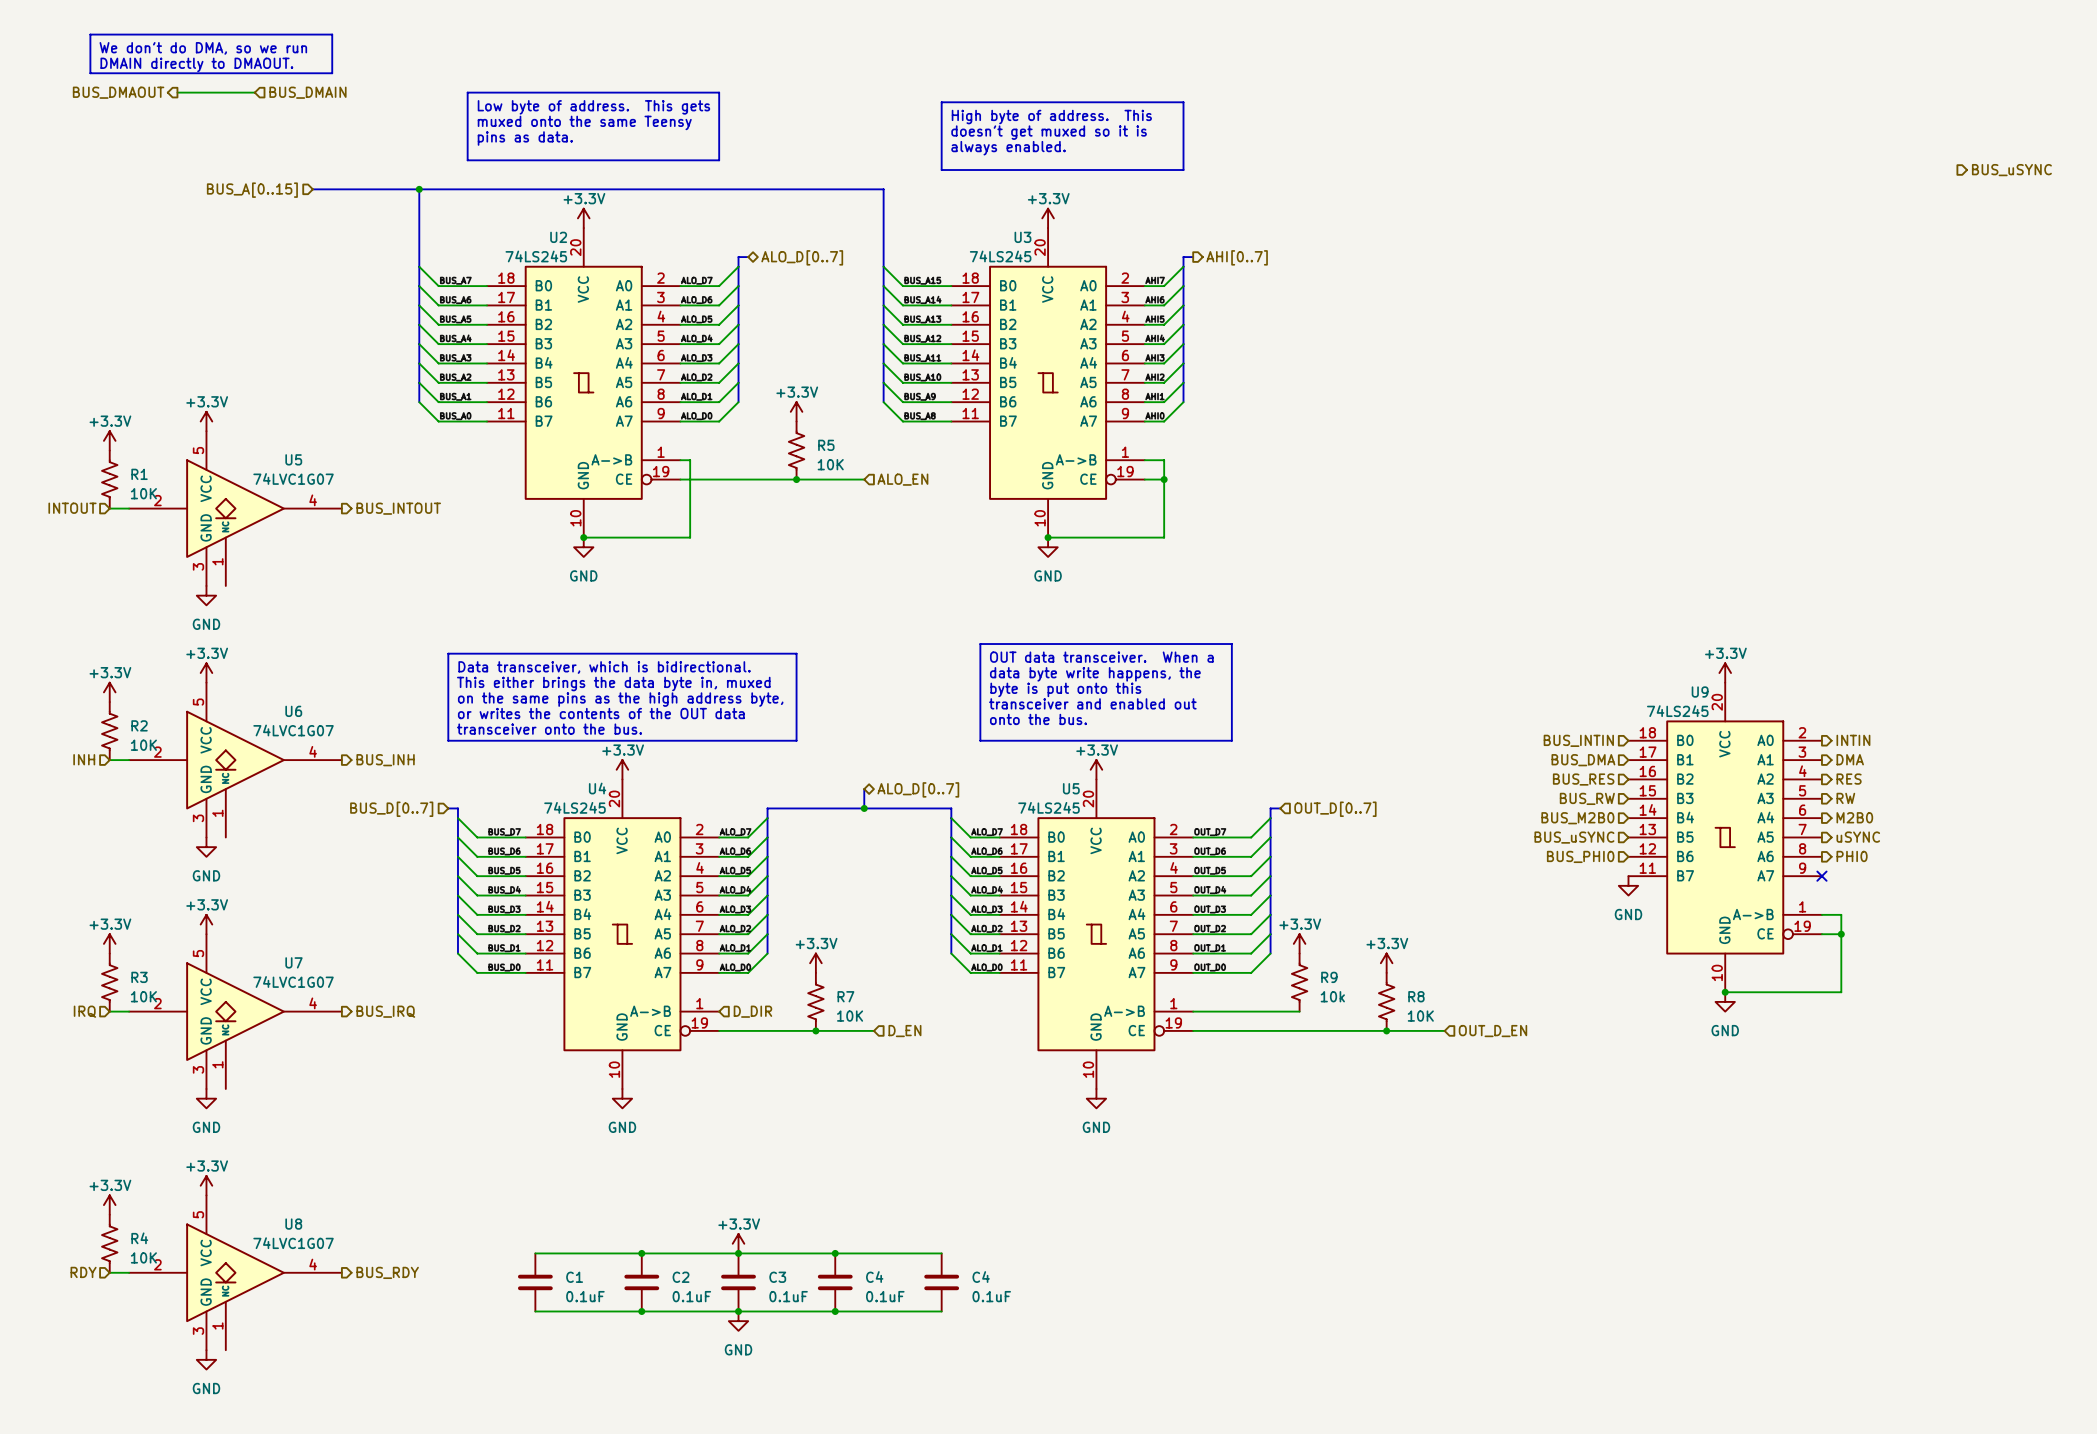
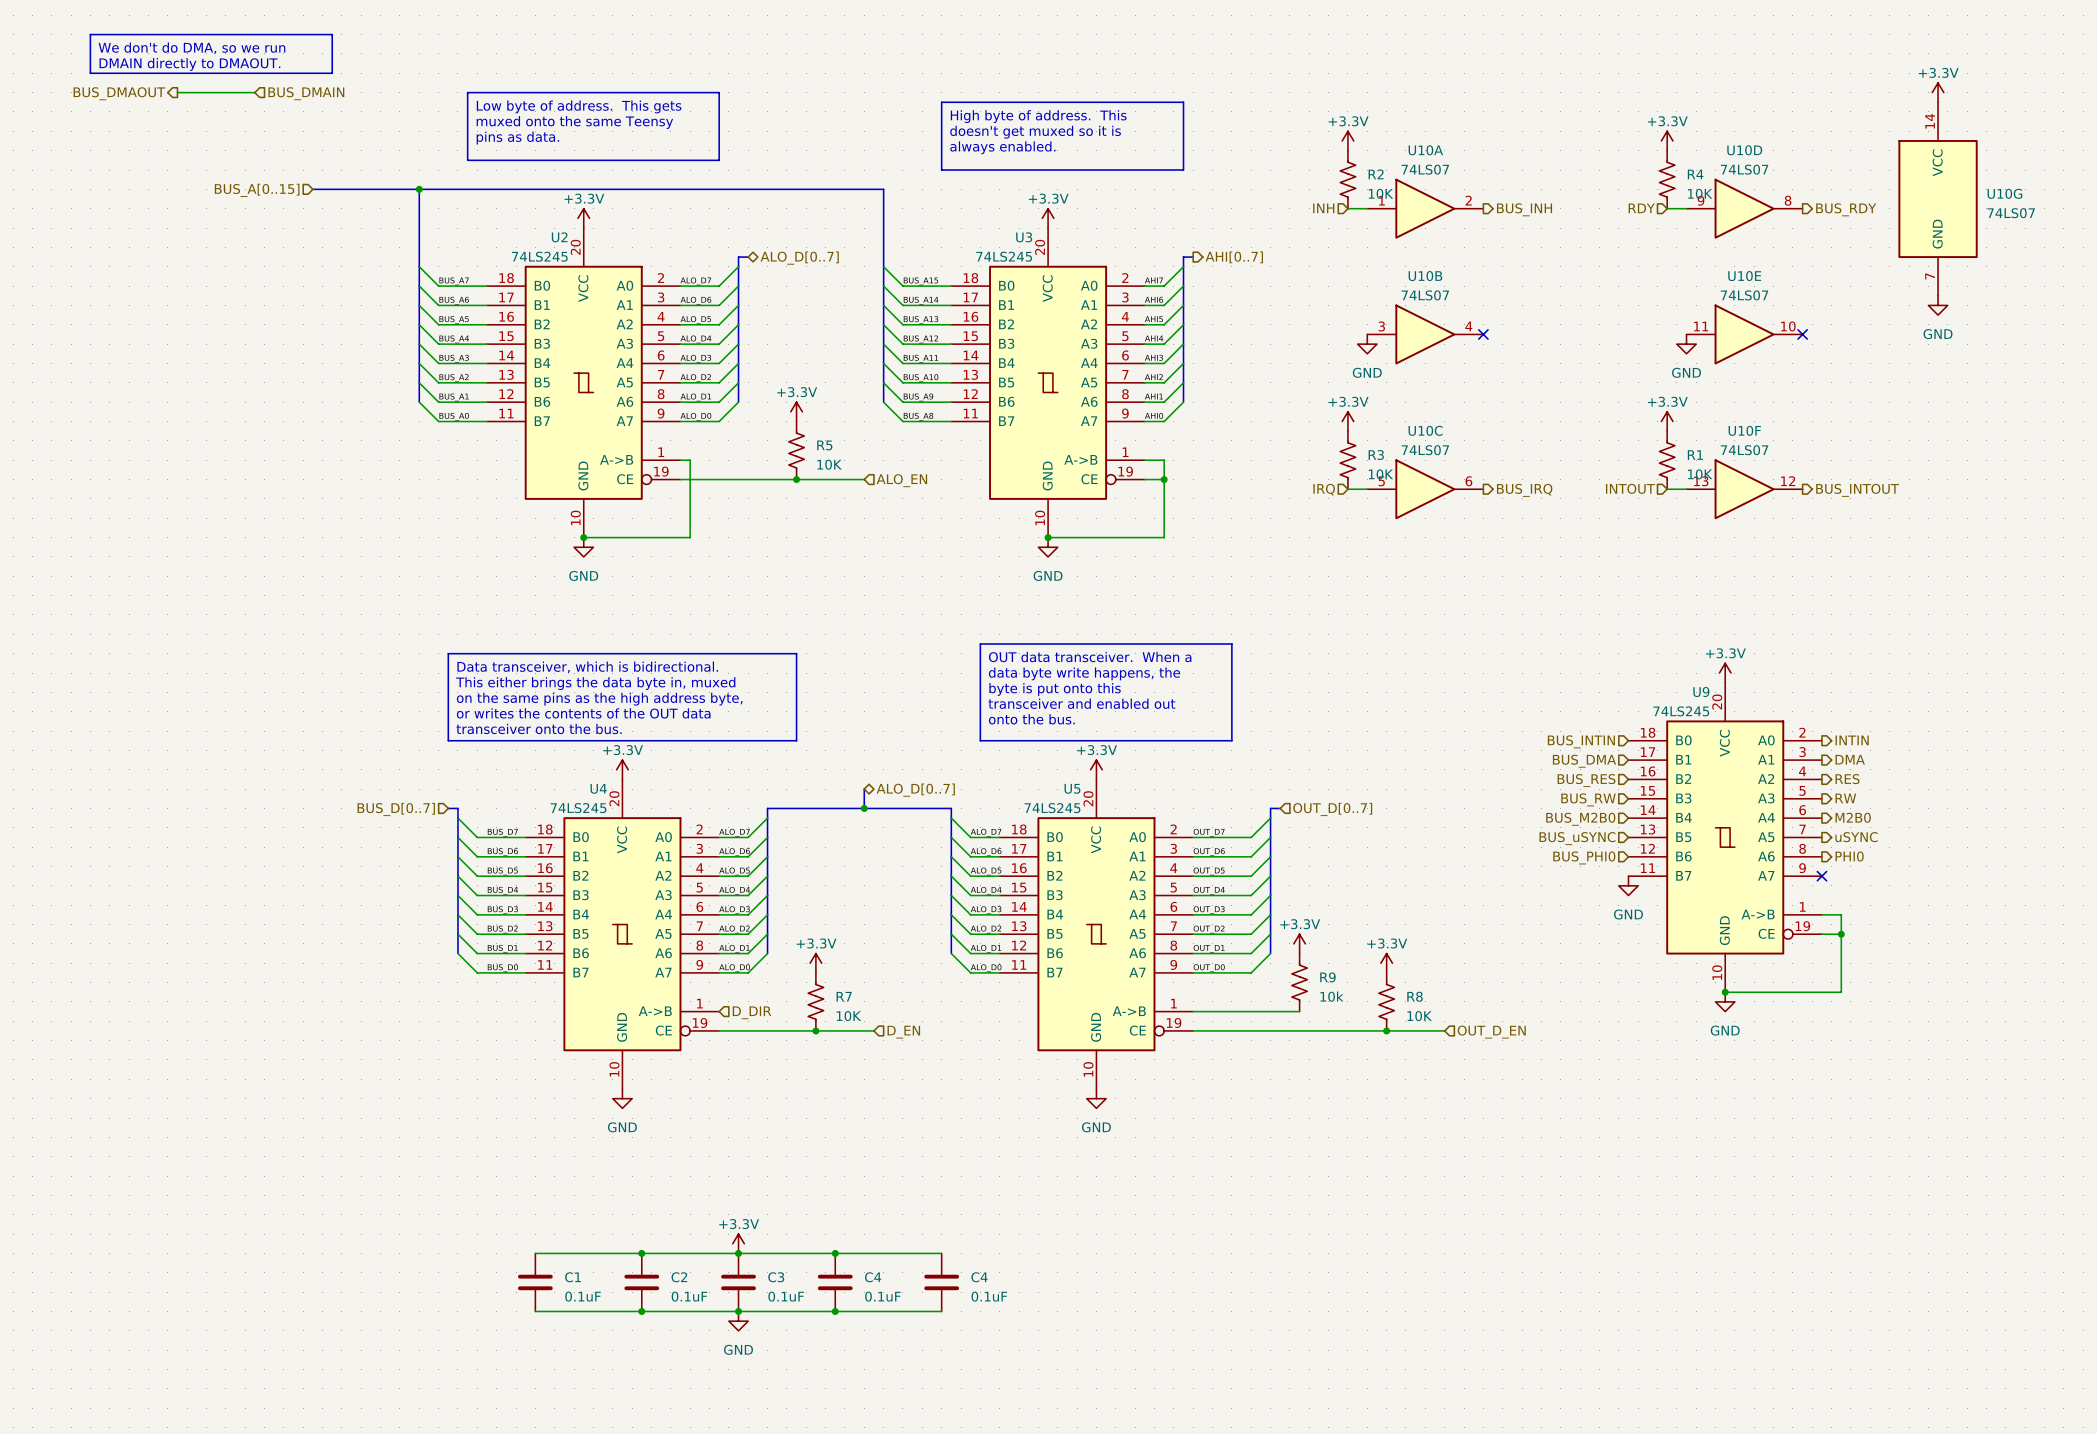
power symbol: none -> +3.3V (1938, 92)
power symbol: none -> +3.3V (1347, 140)
power symbol: none -> +3.3V (1667, 140)
hierarchical label: BUS_uSYNC (2011, 170) -> none
U10G: none -> 74LS07 (1938, 199)
hierarchical label: none -> INH (1323, 208)
wire: none -> (1347, 208) (1367, 208)
U10A: none -> 74LS07 (1425, 208)
hierarchical label: none -> BUS_INH (1524, 209)
hierarchical label: none -> RDY (1641, 208)
wire: none -> (1667, 208) (1686, 208)
U10D: none -> 74LS07 (1744, 208)
hierarchical label: none -> BUS_RDY (1846, 209)
power symbol: none -> GND (1938, 305)
U10B: none -> 74LS07 (1425, 334)
no-connect mark: none -> (1483, 334)
U10E: none -> 74LS07 (1744, 334)
no-connect mark: none -> (1802, 334)
power symbol: none -> GND (1367, 344)
power symbol: none -> GND (1686, 344)
power symbol: +3.3V (206, 421) -> none
power symbol: none -> +3.3V (1347, 421)
power symbol: none -> +3.3V (1667, 421)
power symbol: +3.3V (109, 440) -> none
R1 position: (109, 479) -> (1667, 460)
hierarchical label: none -> INTOUT (1630, 488)
hierarchical label: none -> IRQ (1324, 489)
wire: none -> (1347, 489) (1367, 489)
U10C: none -> 74LS07 (1425, 489)
hierarchical label: none -> BUS_IRQ (1524, 490)
wire: none -> (1667, 489) (1686, 489)
U10F: none -> 74LS07 (1744, 489)
hierarchical label: none -> BUS_INTOUT (1857, 490)
hierarchical label: INTOUT (72, 508) -> none
wire: (109, 508) (129, 508) -> none
U5: 74LVC1G07 (235, 508) -> none
hierarchical label: BUS_INTOUT (398, 508) -> none
power symbol: GND (206, 595) -> none
power symbol: +3.3V (206, 673) -> none
power symbol: +3.3V (109, 692) -> none
R2 position: (109, 731) -> (1347, 179)
hierarchical label: INH (84, 759) -> none
wire: (109, 760) (129, 760) -> none
U6: 74LVC1G07 (235, 760) -> none
hierarchical label: BUS_INH (385, 760) -> none
power symbol: GND (206, 847) -> none
power symbol: +3.3V (206, 924) -> none
power symbol: +3.3V (109, 943) -> none
R3 position: (109, 982) -> (1347, 460)
hierarchical label: IRQ (84, 1011) -> none
wire: (109, 1011) (129, 1011) -> none
U7: 74LVC1G07 (235, 1011) -> none
hierarchical label: BUS_IRQ (385, 1011) -> none
power symbol: GND (206, 1098) -> none
power symbol: +3.3V (206, 1185) -> none
power symbol: +3.3V (109, 1205) -> none
R4 position: (109, 1243) -> (1667, 179)
hierarchical label: RDY (83, 1272) -> none
wire: (109, 1272) (129, 1272) -> none
U8: 74LVC1G07 (235, 1272) -> none
hierarchical label: BUS_RDY (387, 1272) -> none
power symbol: GND (206, 1359) -> none

